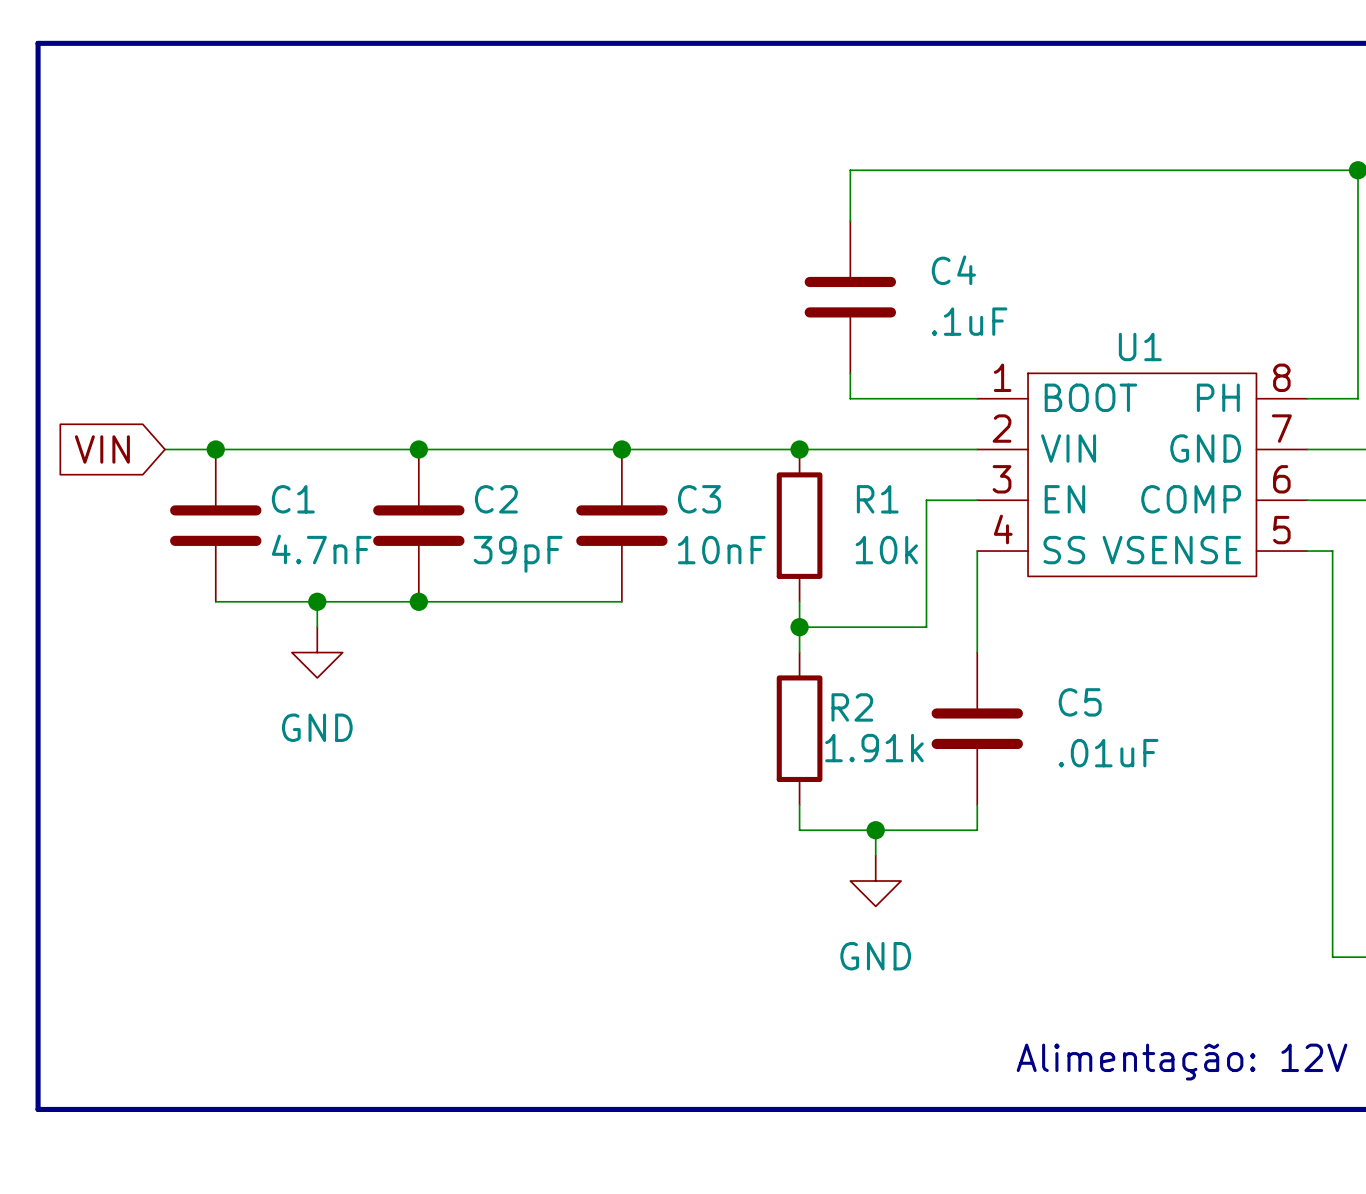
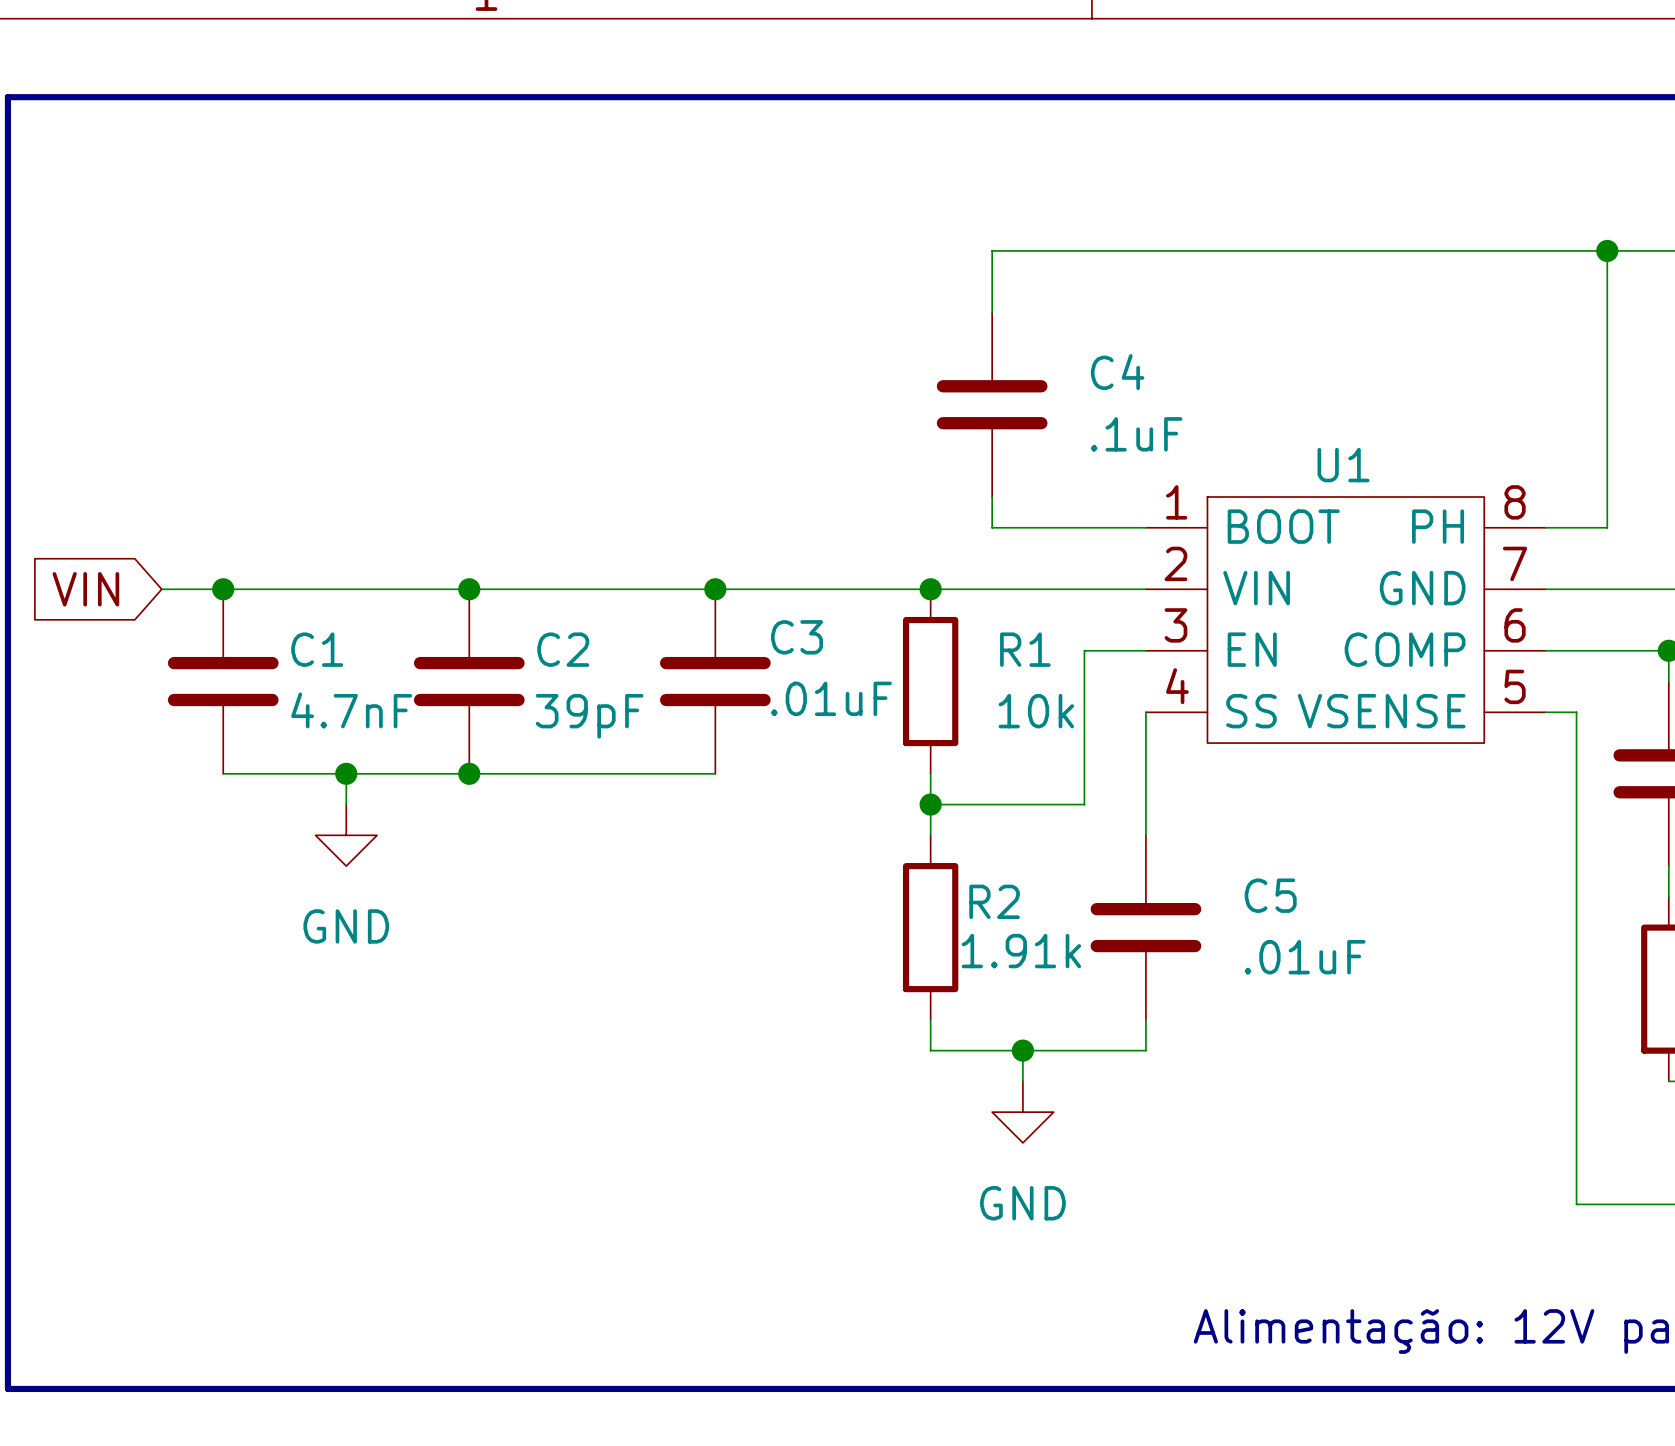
C3 name position: C3 (699, 499) -> C3 (797, 637)
C3 value: 10nF (721, 550) -> .01uF (831, 698)

